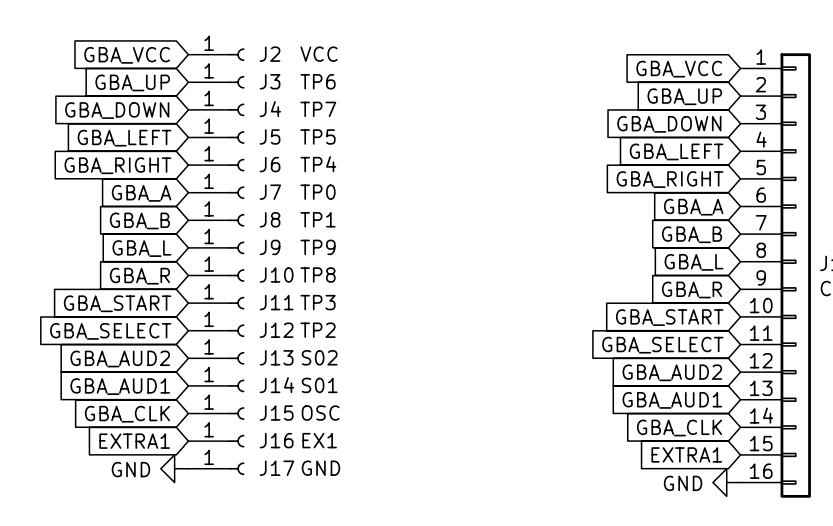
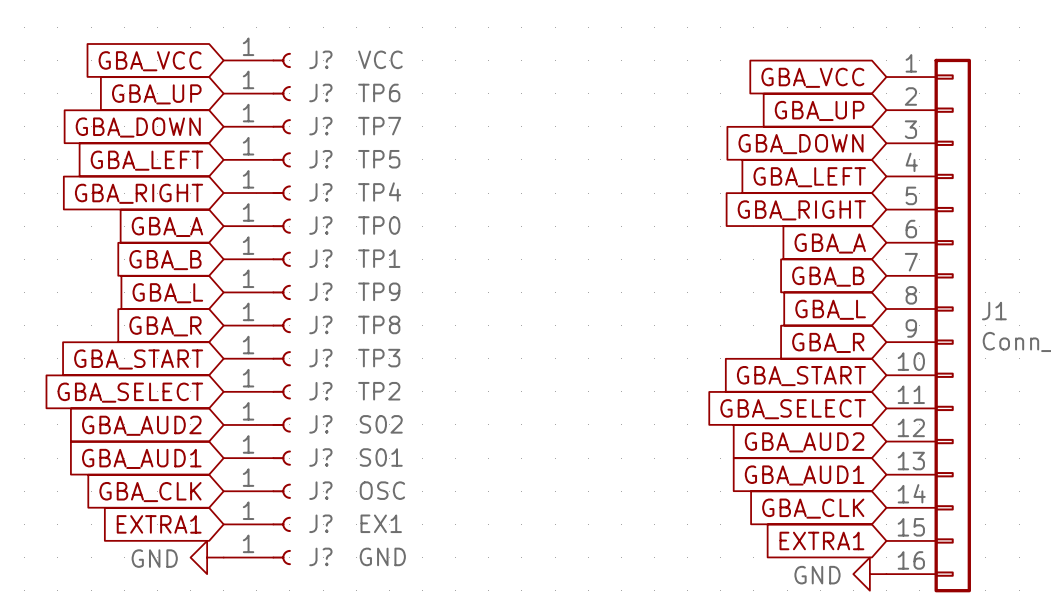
J2 name: J2 (270, 54) -> J? (320, 59)
J3 name: J3 (270, 81) -> J? (320, 92)
J4 name: J4 (270, 109) -> J? (320, 126)
J5 name: J5 (270, 136) -> J? (320, 159)
J6 name: J6 (270, 164) -> J? (320, 192)
J7 name: J7 (270, 192) -> J? (320, 225)
J8 name: J8 (270, 219) -> J? (320, 258)
J9 name: J9 (270, 247) -> J? (320, 291)
J10 name: J10 (276, 274) -> J? (320, 324)
J11 name: J11 (276, 302) -> J? (320, 358)
J12 name: J12 (276, 330) -> J? (320, 391)
J13 name: J13 (276, 357) -> J? (320, 424)
J14 name: J14 (276, 385) -> J? (320, 457)
J15 name: J15 (276, 413) -> J? (320, 490)
J16 name: J16 (276, 440) -> J? (320, 523)
J17 name: J17 (276, 468) -> J? (320, 556)

